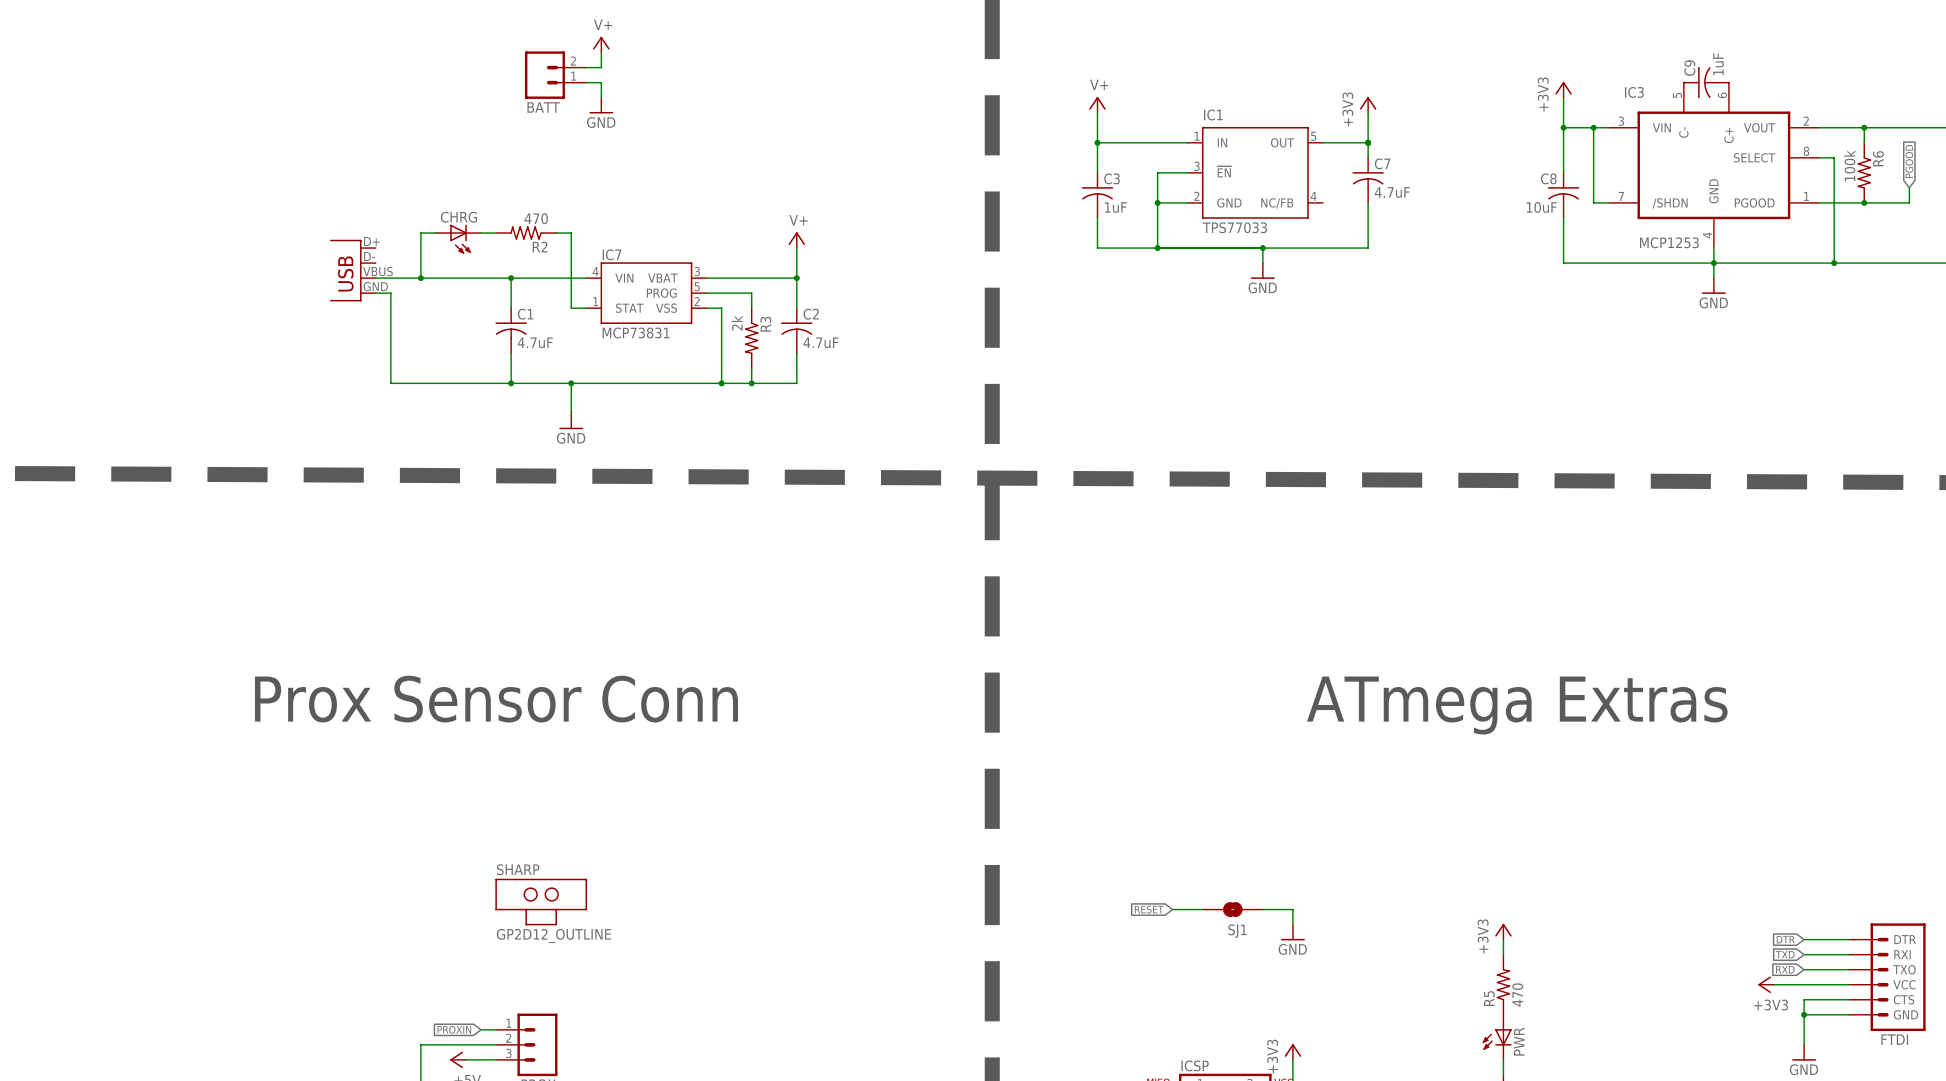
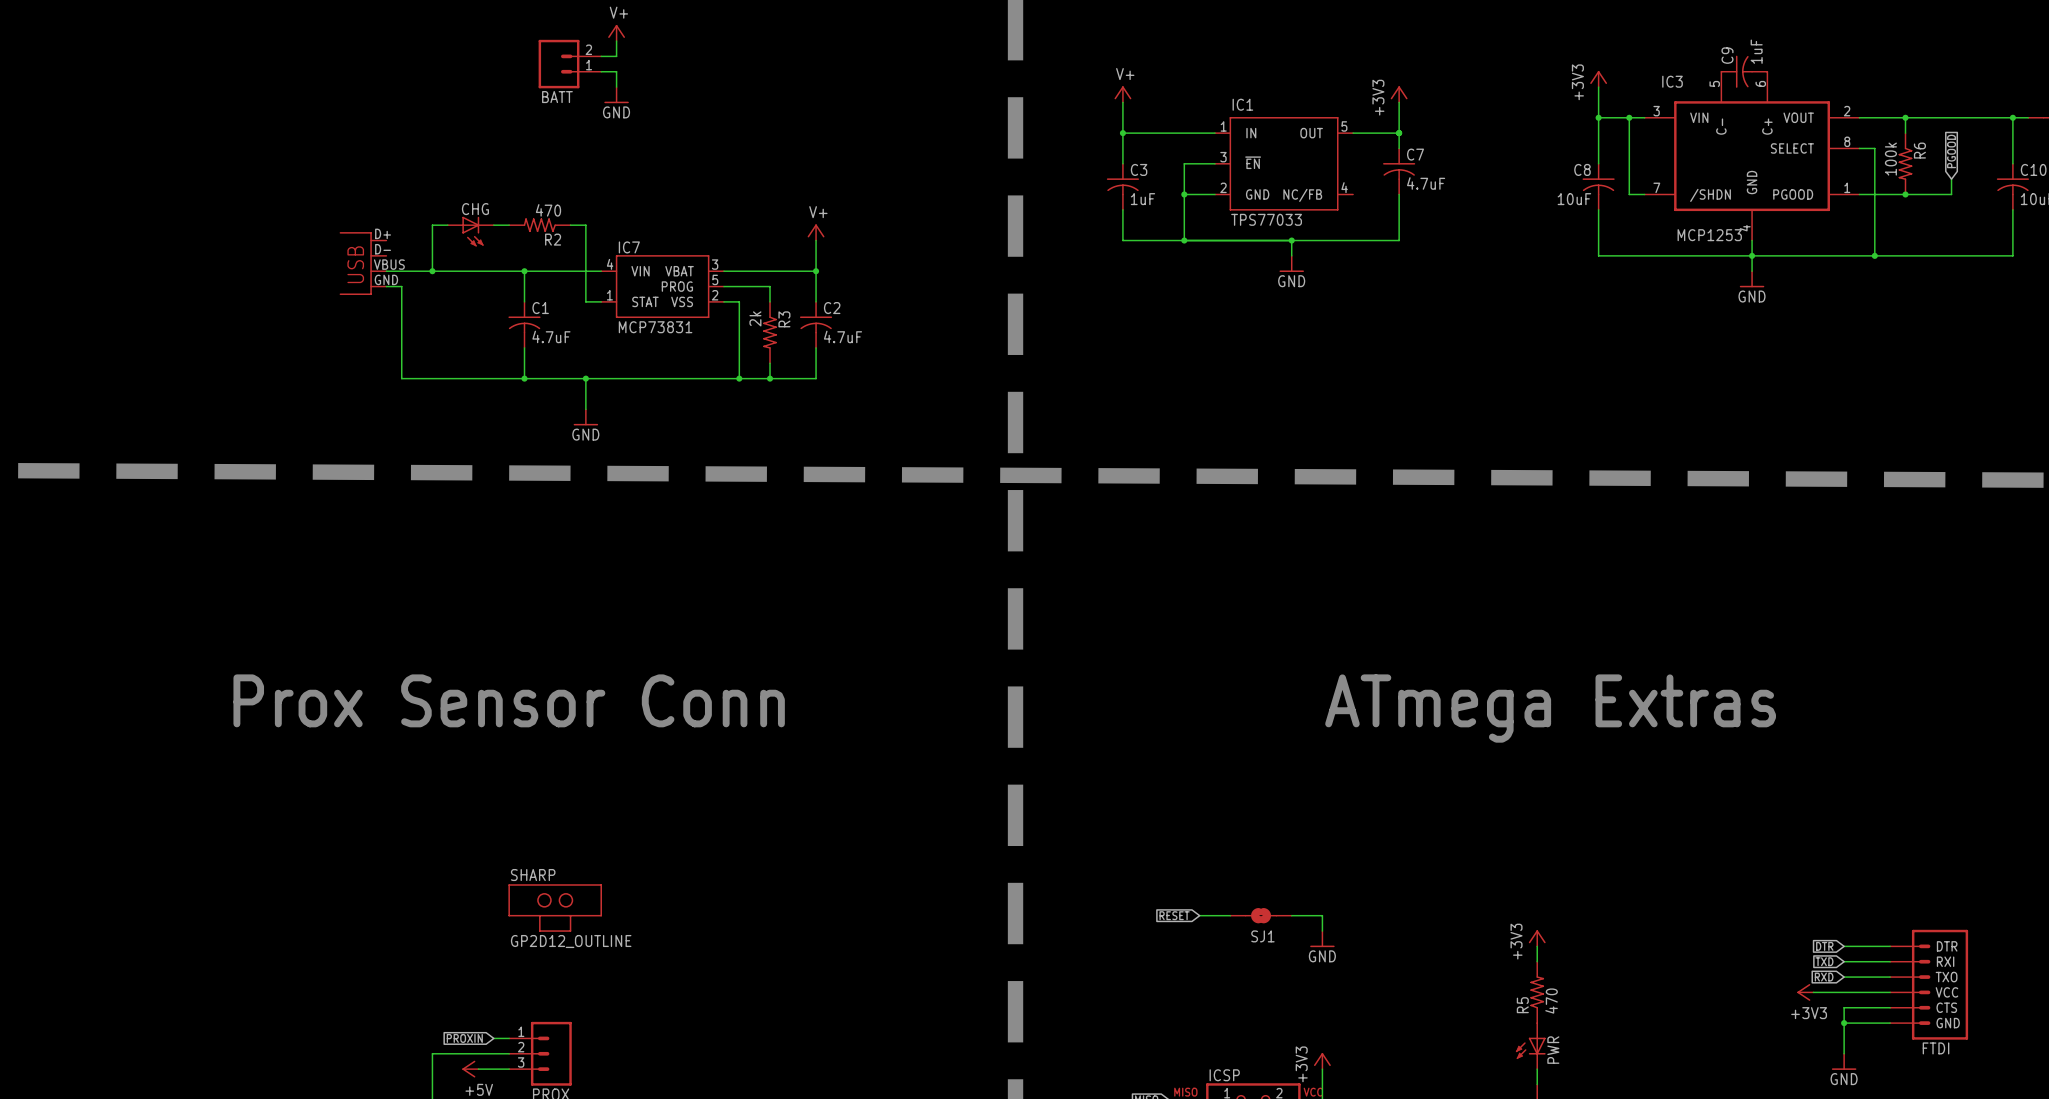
CHRG name: CHRG (458, 217) -> CHG (475, 209)

